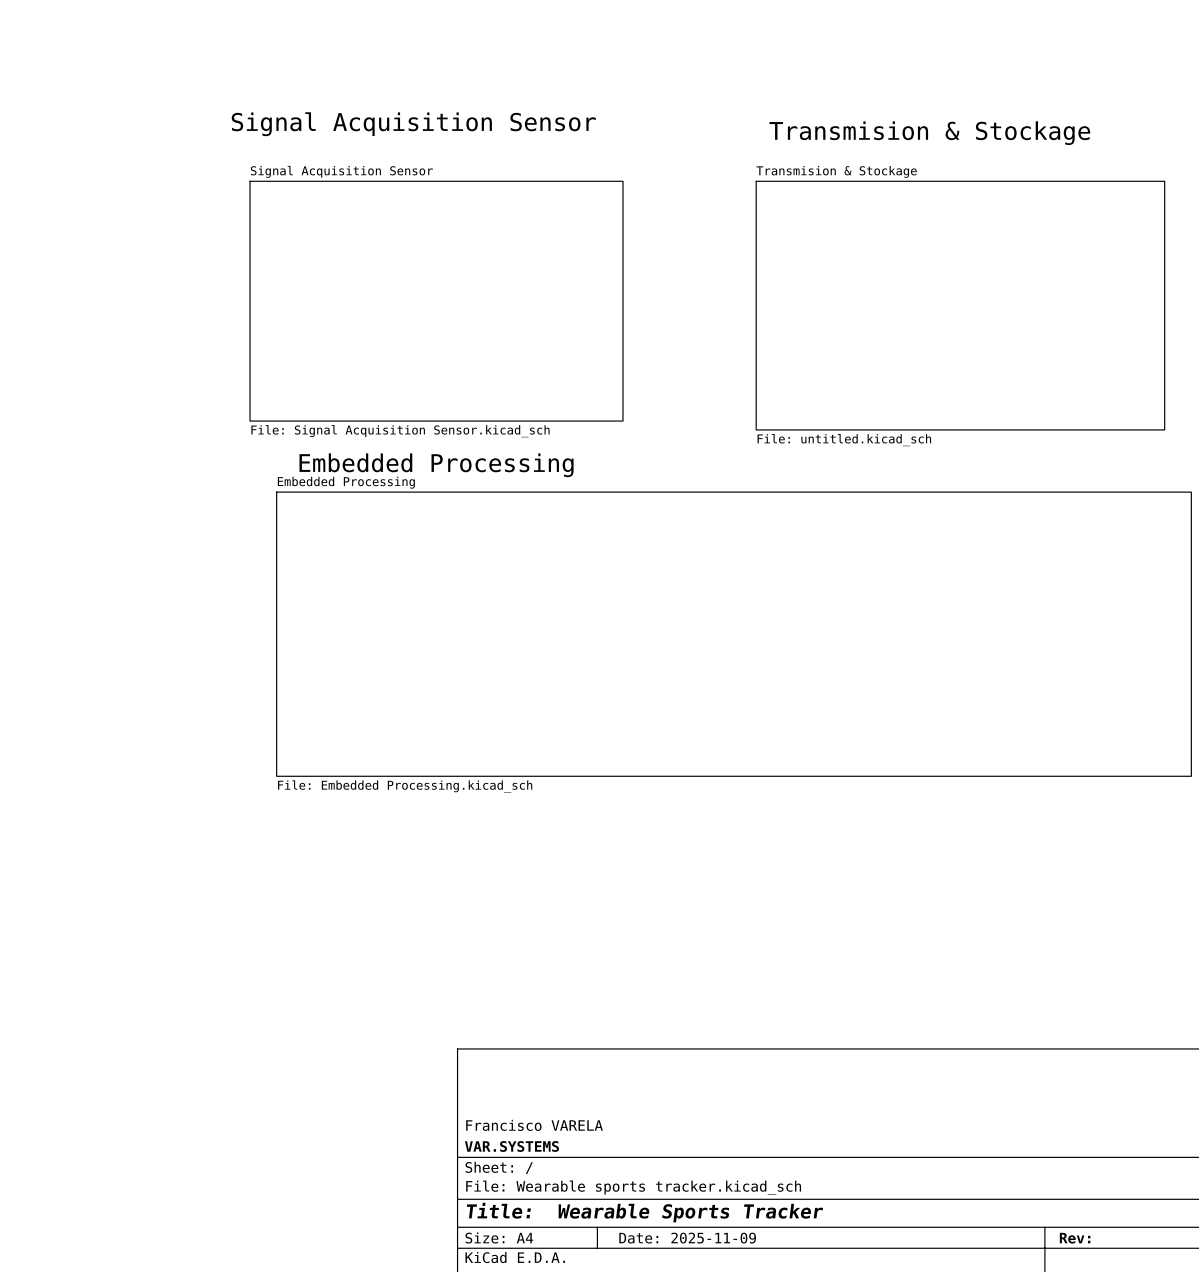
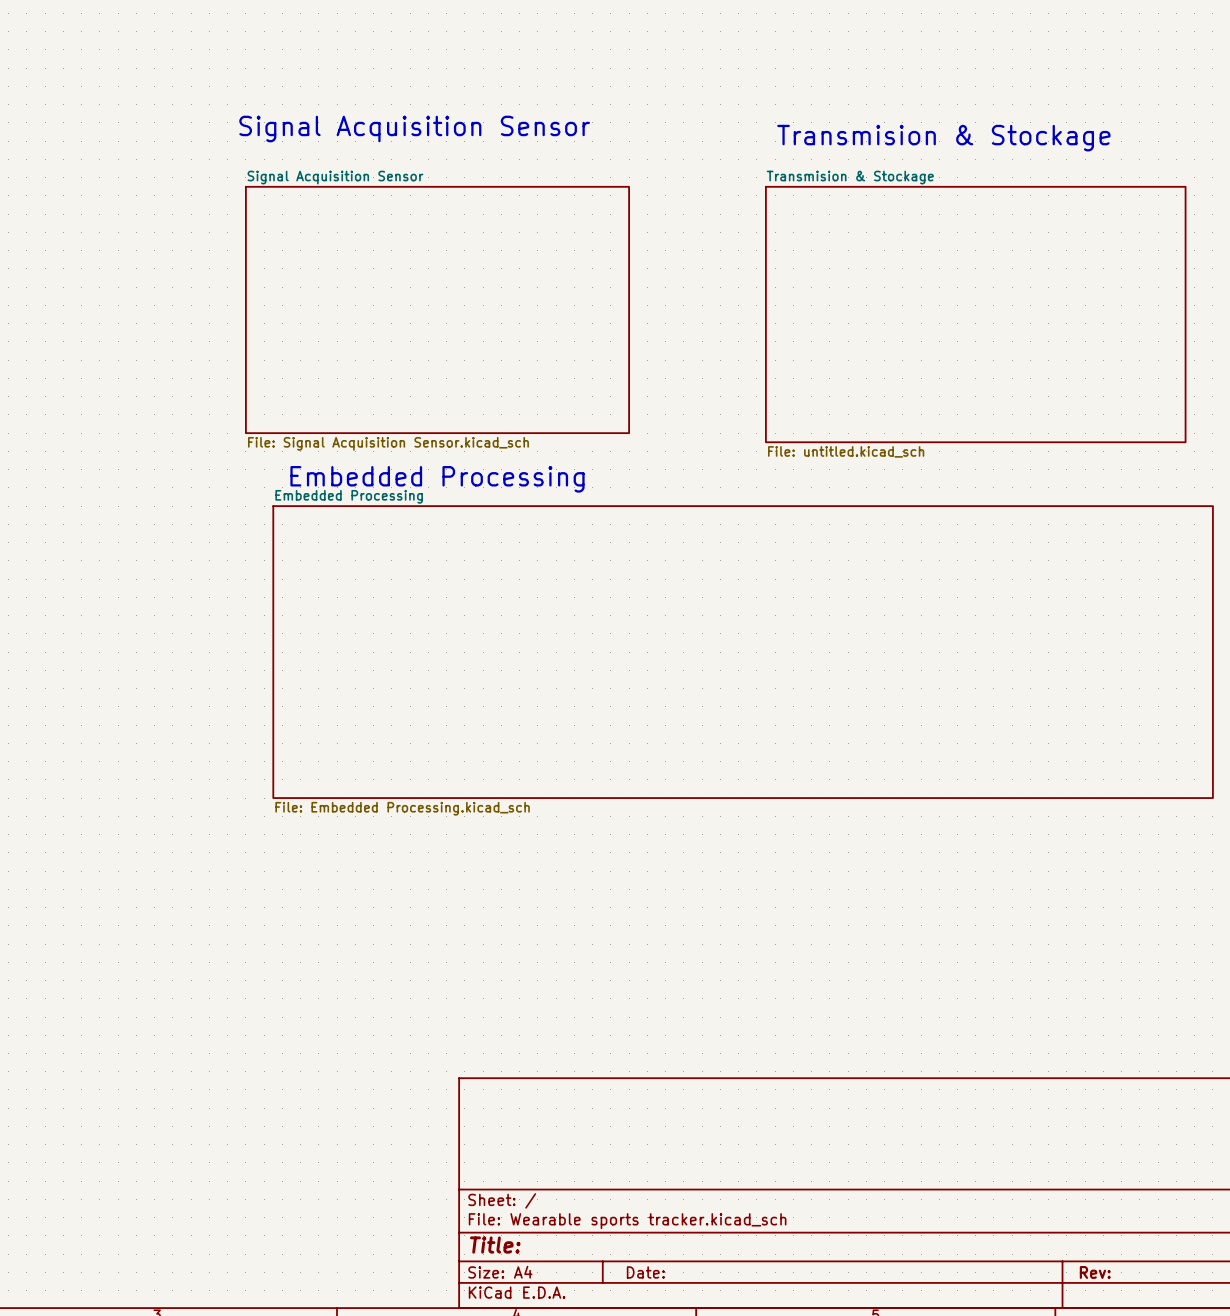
title block: Francisco VARELA (534, 1125) -> none
title block: VAR.SYSTEMS (511, 1146) -> none
title block: Title: Wearable Sports Tracker (644, 1212) -> Title: (495, 1245)
title block: Date: 2025-11-09 (687, 1238) -> Date: (645, 1272)

